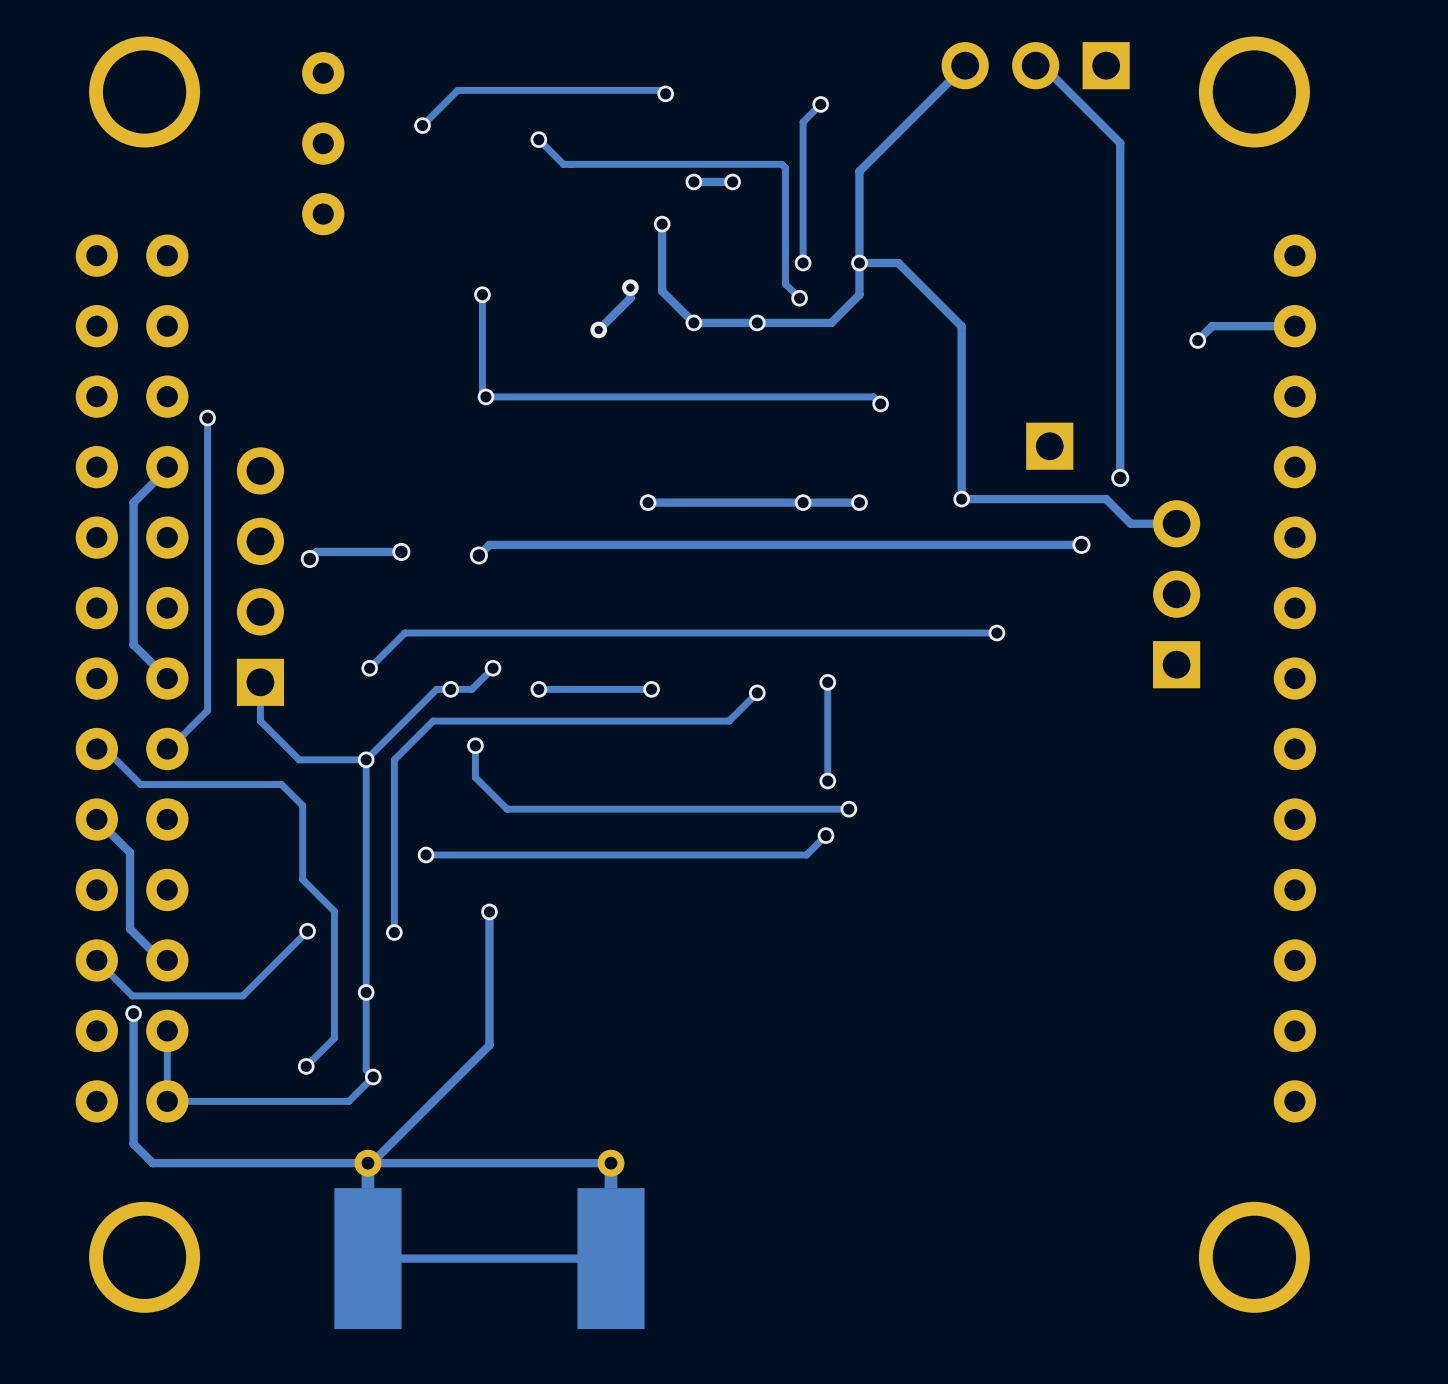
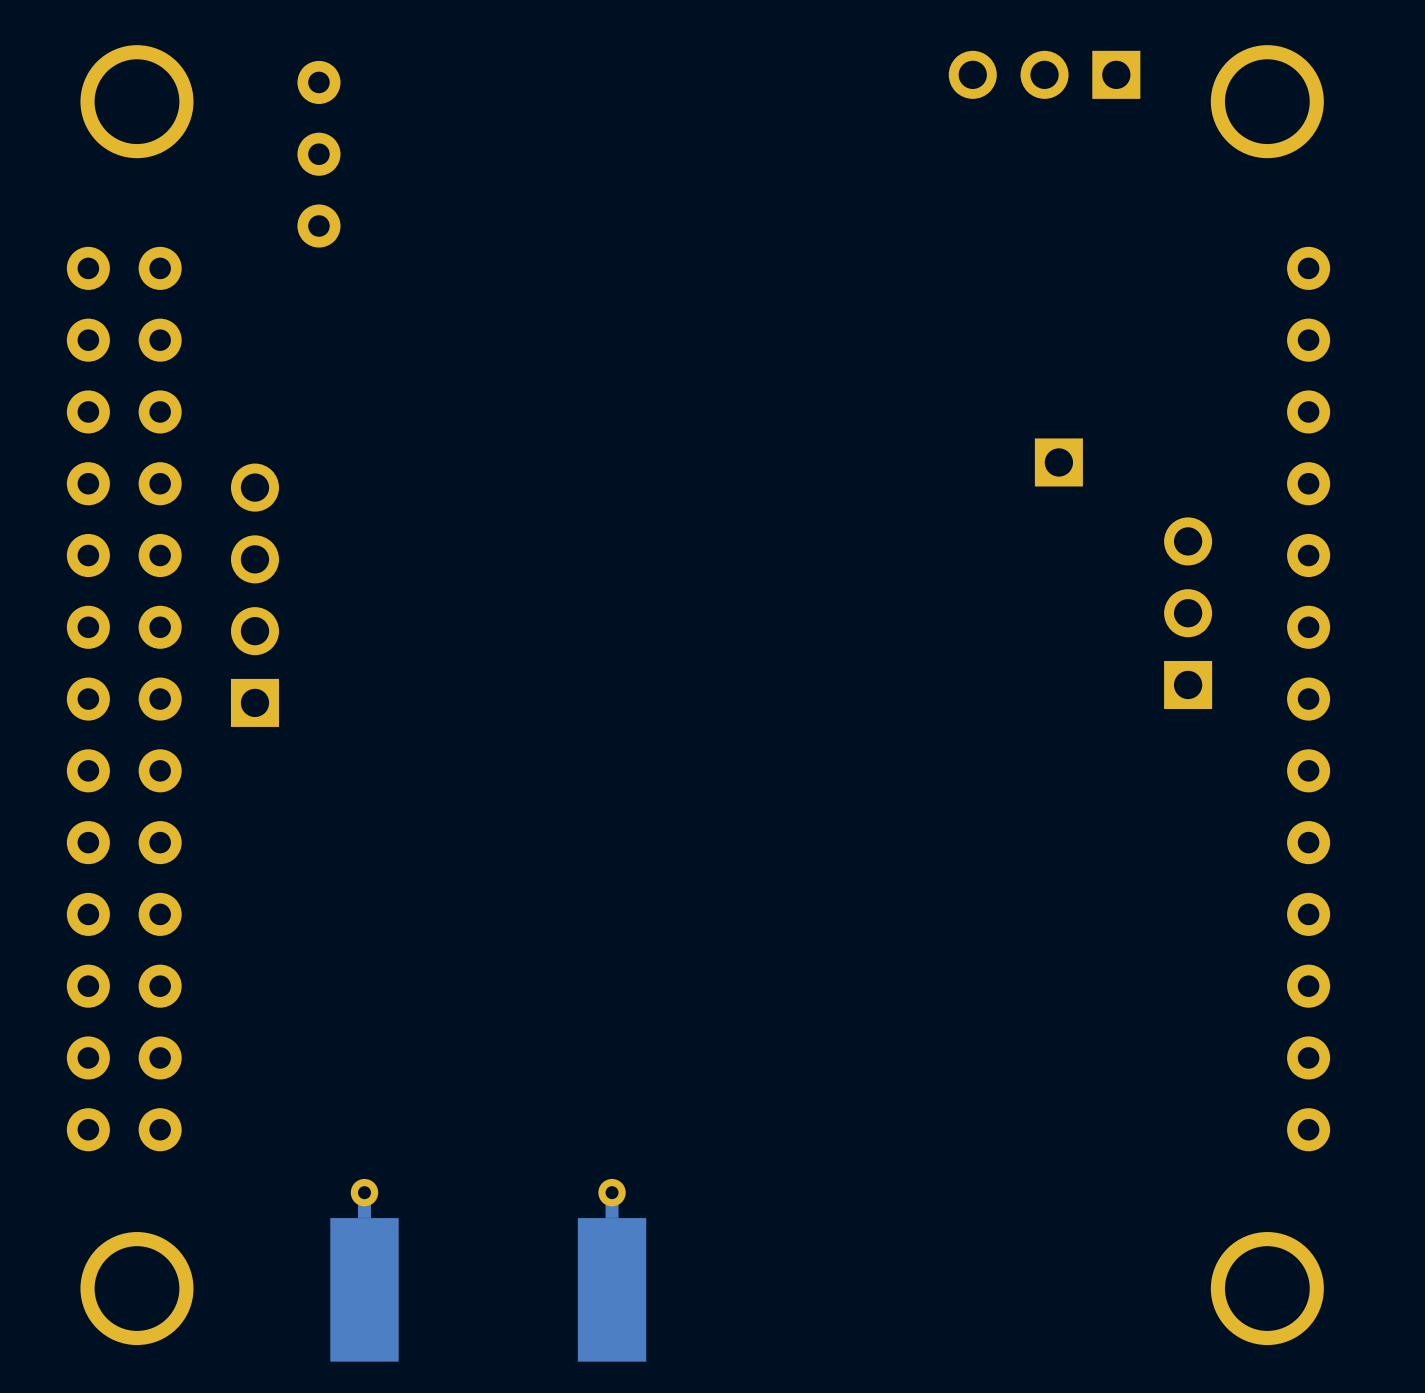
track: (965, 65) (859, 171) (859, 294) (831, 322) (693, 322) (662, 291) (662, 224) -> none
track: (1035, 65) (1042, 65) (1120, 143) (1120, 477) -> none
track: (665, 93) (662, 90) (457, 90) (422, 125) -> none
via: (665, 93) -> none
track: (820, 104) (803, 122) (803, 263) -> none
via: (820, 104) -> none
via: (422, 125) -> none
track: (538, 139) (563, 164) (781, 164) (785, 167) (785, 284) (799, 298) -> none
via: (538, 139) -> none
via: (693, 181) -> none
track: (732, 181) (693, 181) -> none
via: (732, 181) -> none
via: (662, 224) -> none
via: (803, 263) -> none
track: (859, 263) (898, 263) (961, 326) (961, 499) (1106, 499) (1130, 523) (1176, 523) -> none
via: (859, 263) -> none
track: (630, 287) (630, 298) (598, 329) -> none
via: (630, 287) -> none
track: (482, 294) (482, 393) (485, 396) (873, 396) (880, 403) -> none
via: (482, 294) -> none
via: (799, 298) -> none
via: (693, 322) -> none
via: (757, 322) -> none
track: (1294, 326) (1212, 326) (1197, 340) -> none
via: (598, 329) -> none
via: (1197, 340) -> none
via: (485, 396) -> none
via: (880, 403) -> none
track: (207, 418) (207, 710) (167, 749) -> none
via: (207, 418) -> none
track: (167, 467) (133, 502) (133, 644) (167, 678) -> none
via: (1120, 477) -> none
via: (961, 499) -> none
via: (648, 502) -> none
via: (803, 502) -> none
track: (859, 502) (648, 502) -> none
via: (859, 502) -> none
track: (1081, 544) (489, 544) (478, 555) -> none
via: (1081, 544) -> none
track: (401, 551) (316, 551) (309, 559) -> none
via: (401, 551) -> none
via: (478, 555) -> none
via: (309, 559) -> none
track: (996, 633) (404, 633) (369, 668) -> none
via: (996, 633) -> none
via: (369, 668) -> none
track: (493, 668) (471, 689) (436, 689) (366, 759) -> none
via: (493, 668) -> none
track: (260, 682) (260, 721) (299, 759) (366, 759) -> none
track: (827, 682) (827, 781) -> none
via: (827, 682) -> none
via: (450, 689) -> none
via: (538, 689) -> none
track: (651, 689) (538, 689) -> none
via: (651, 689) -> none
track: (757, 692) (729, 721) (433, 721) (394, 759) (394, 932) -> none
via: (757, 692) -> none
track: (475, 745) (475, 777) (507, 809) (848, 809) -> none
via: (475, 745) -> none
track: (96, 749) (105, 749) (140, 784) (281, 784) (302, 805) (302, 879) (334, 911) (334, 1038) (306, 1066) -> none
track: (366, 759) (366, 1069) (373, 1076) (348, 1101) (167, 1101) (167, 1030) -> none
via: (366, 759) -> none
via: (827, 781) -> none
via: (848, 809) -> none
track: (96, 819) (130, 852) (130, 928) (161, 960) (167, 960) -> none
track: (826, 835) (806, 854) (426, 854) -> none
via: (826, 835) -> none
via: (426, 854) -> none
track: (489, 911) (489, 1045) (371, 1163) -> none
via: (489, 911) -> none
track: (307, 931) (242, 995) (132, 995) (96, 960) -> none
via: (307, 931) -> none
via: (394, 932) -> none
via: (366, 992) -> none
track: (133, 1013) (133, 1143) (152, 1163) (611, 1163) -> none
via: (133, 1013) -> none
via: (306, 1066) -> none
via: (373, 1076) -> none
track: (611, 1258) (367, 1258) -> none

